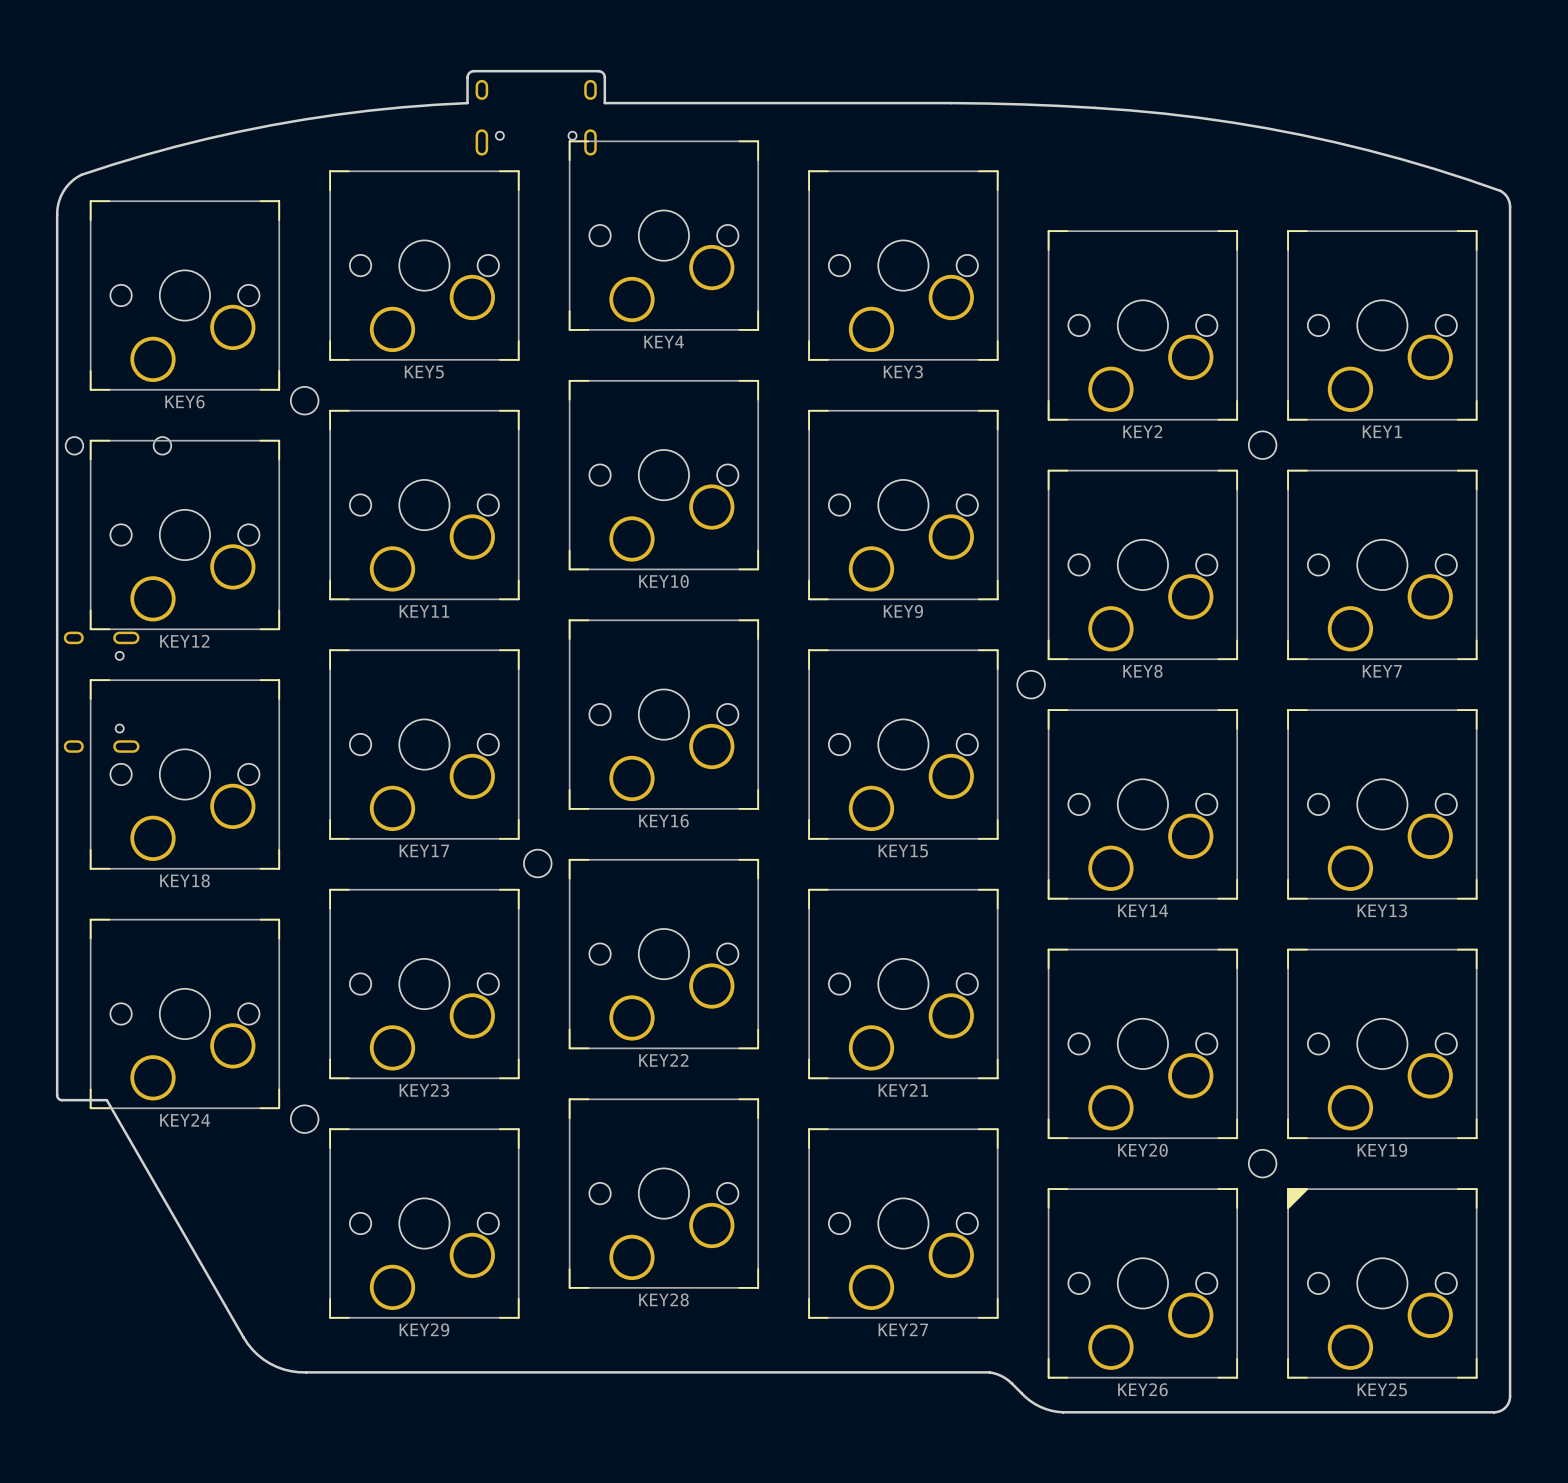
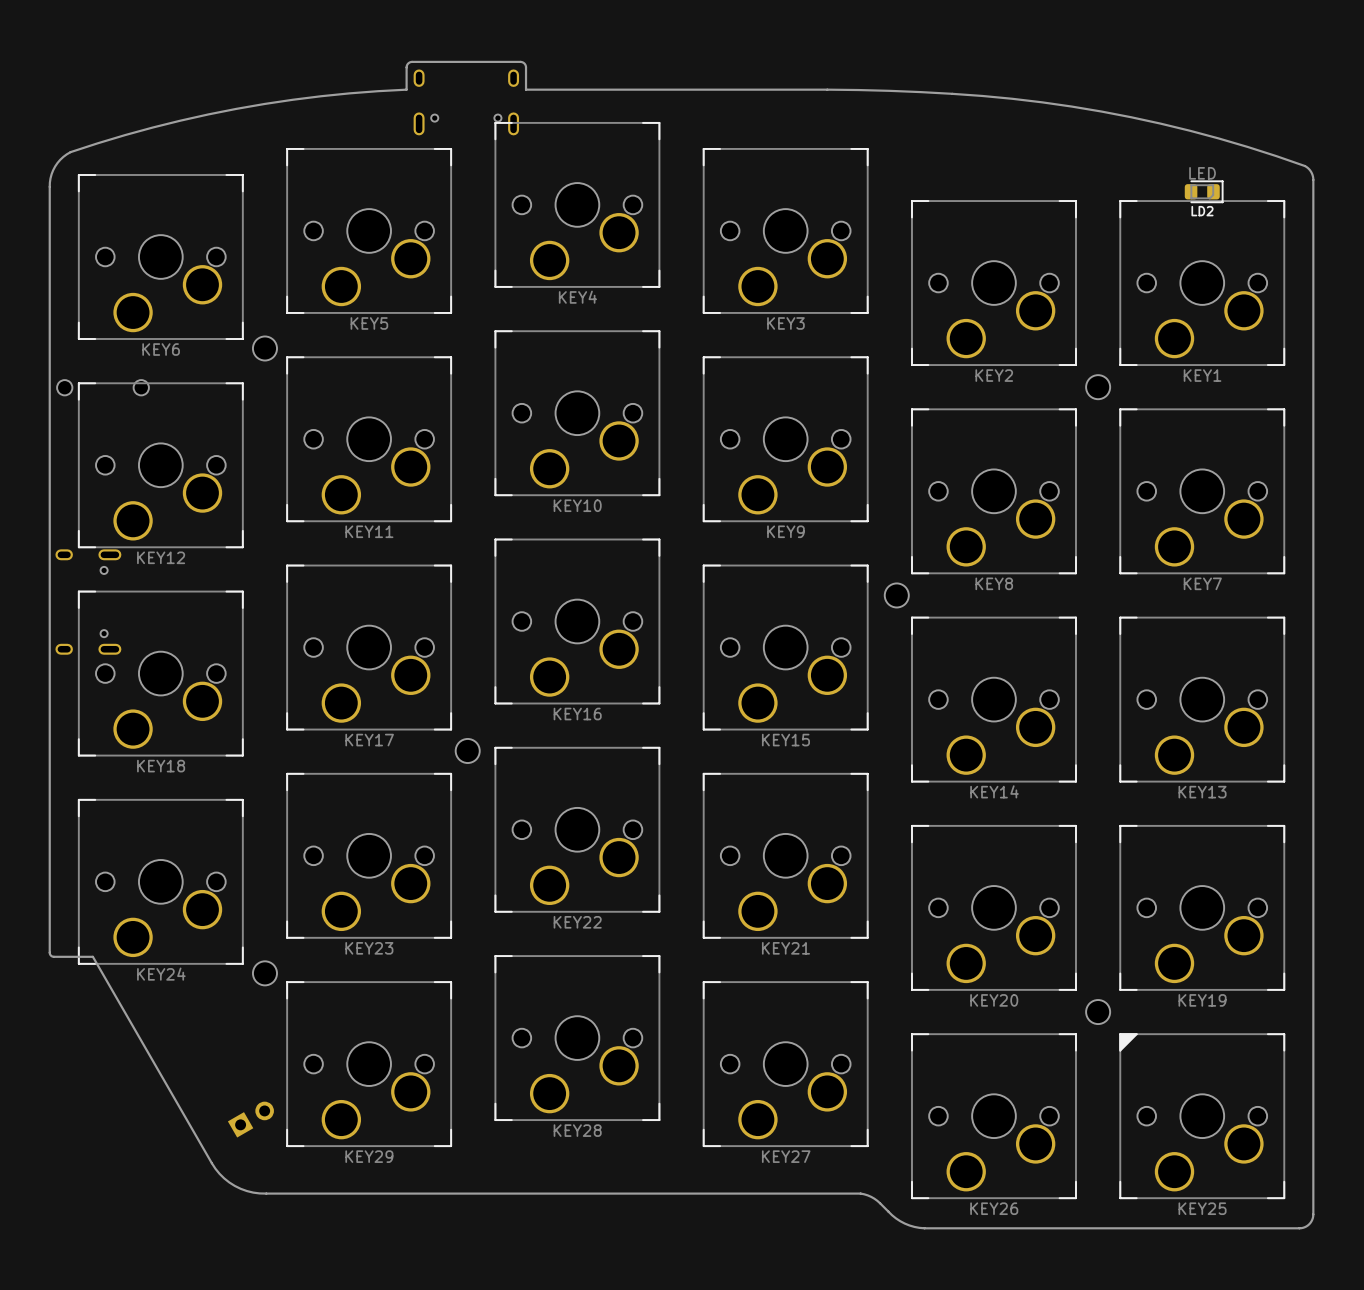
LD2: none -> LED (1204, 191)
part: none -> (250, 1119)

